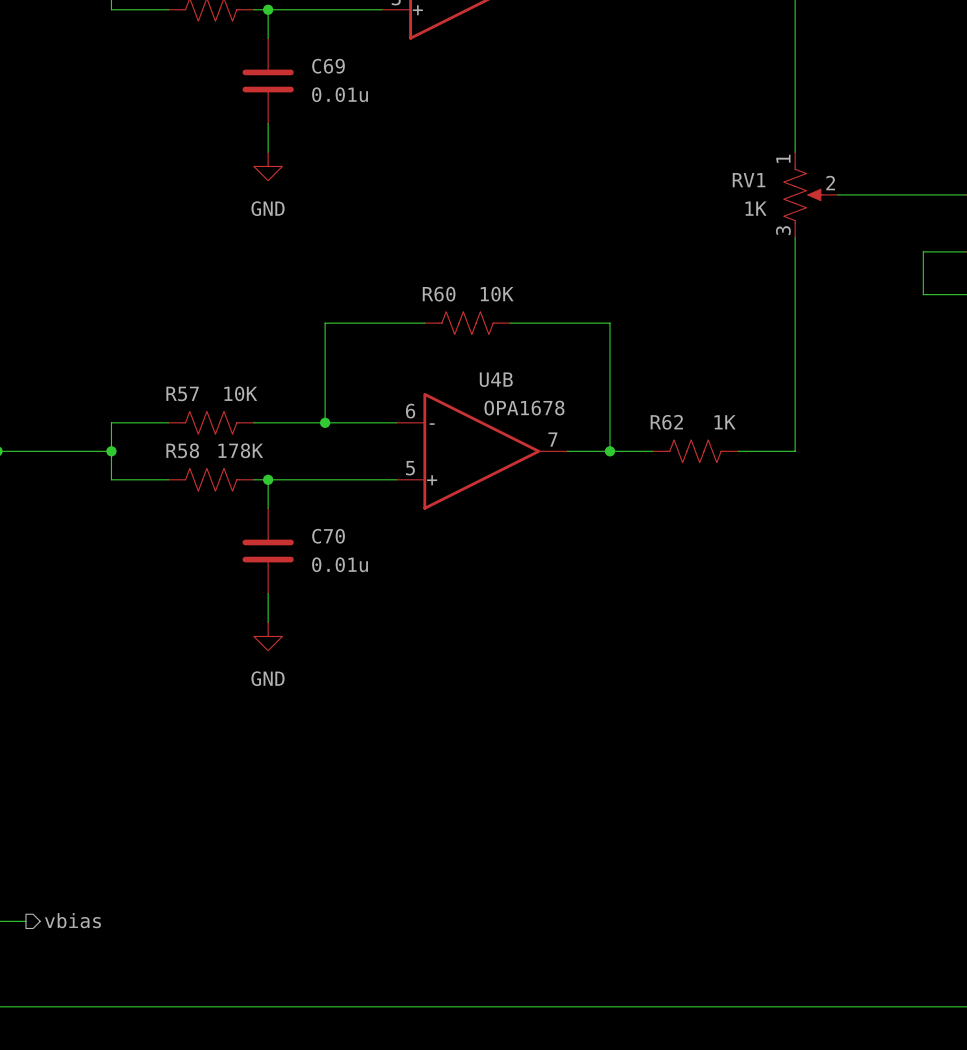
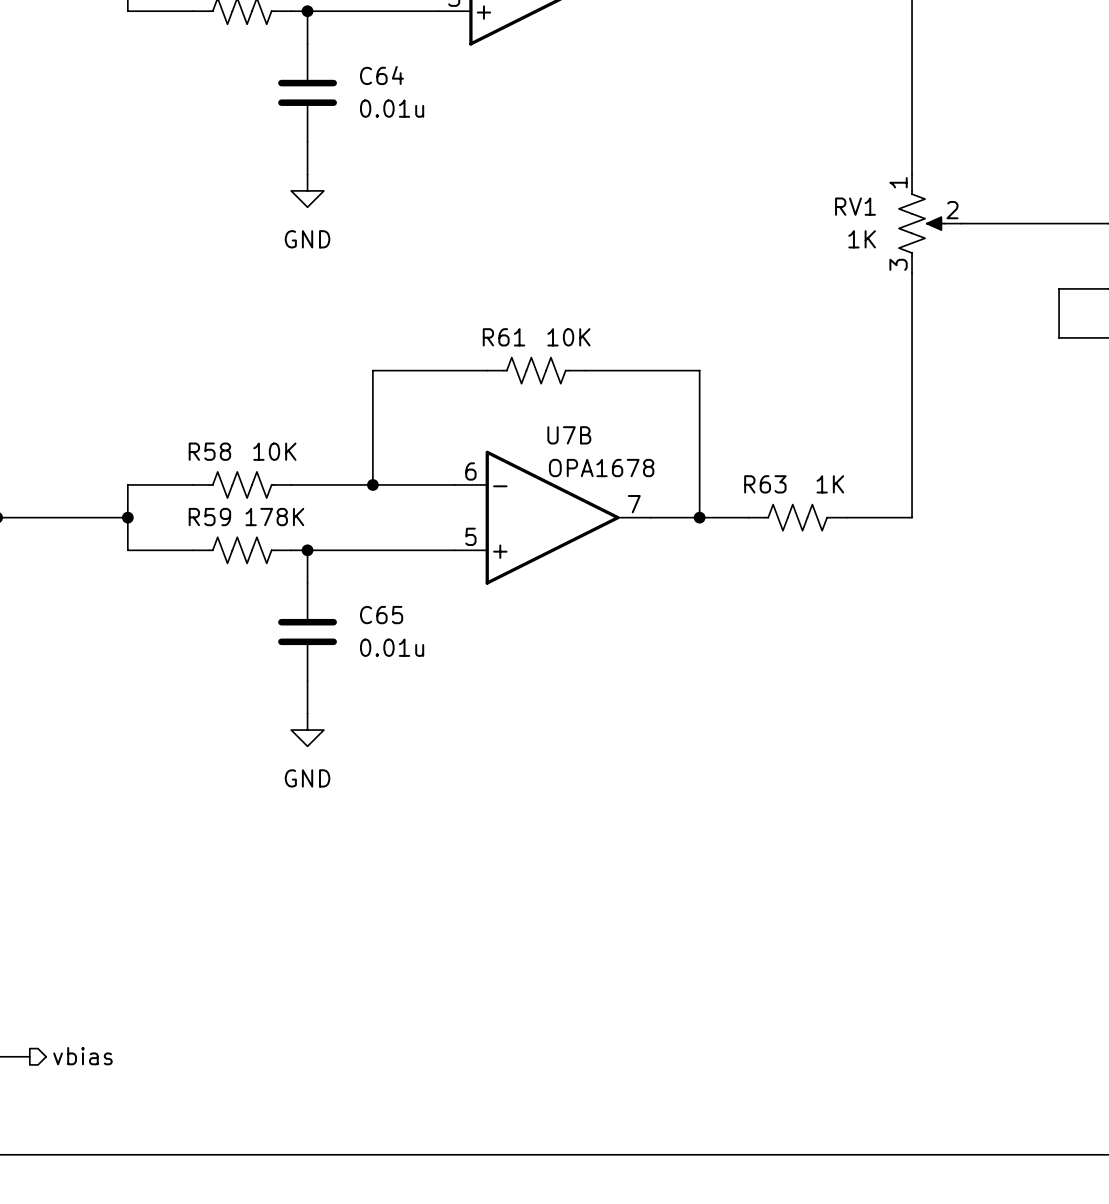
C69 name: C69 (328, 66) -> C64 (381, 75)
R60 name: R60 (439, 294) -> R61 (503, 337)
U4B name: U4B (496, 379) -> U7B (569, 435)
R57 name: R57 (182, 393) -> R58 (209, 451)
R62 name: R62 (666, 422) -> R63 (765, 484)
R58 name: R58 (182, 450) -> R59 (209, 517)
C70 name: C70 (328, 536) -> C65 (381, 615)

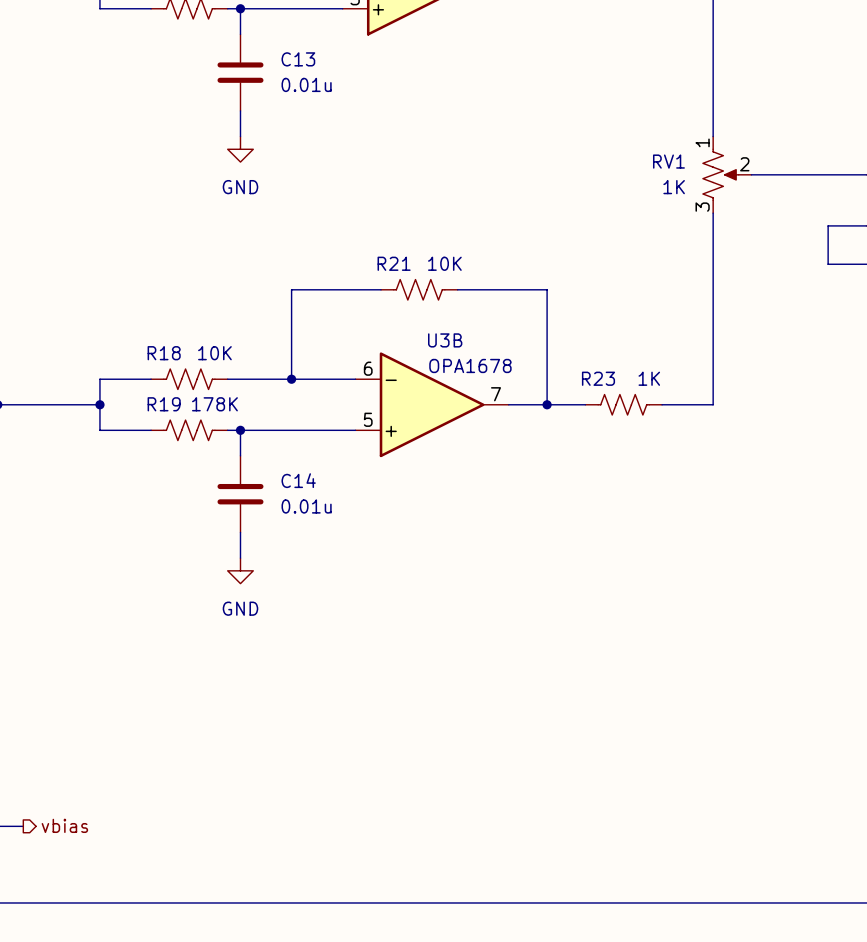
C64 name: C64 (381, 75) -> C13 (298, 59)
R61 name: R61 (503, 337) -> R21 (394, 263)
U7B name: U7B (569, 435) -> U3B (445, 340)
R58 name: R58 (209, 451) -> R18 (164, 353)
R63 name: R63 (765, 484) -> R23 (598, 378)
R59 name: R59 (209, 517) -> R19 (164, 404)
C65 name: C65 (381, 615) -> C14 (298, 480)

